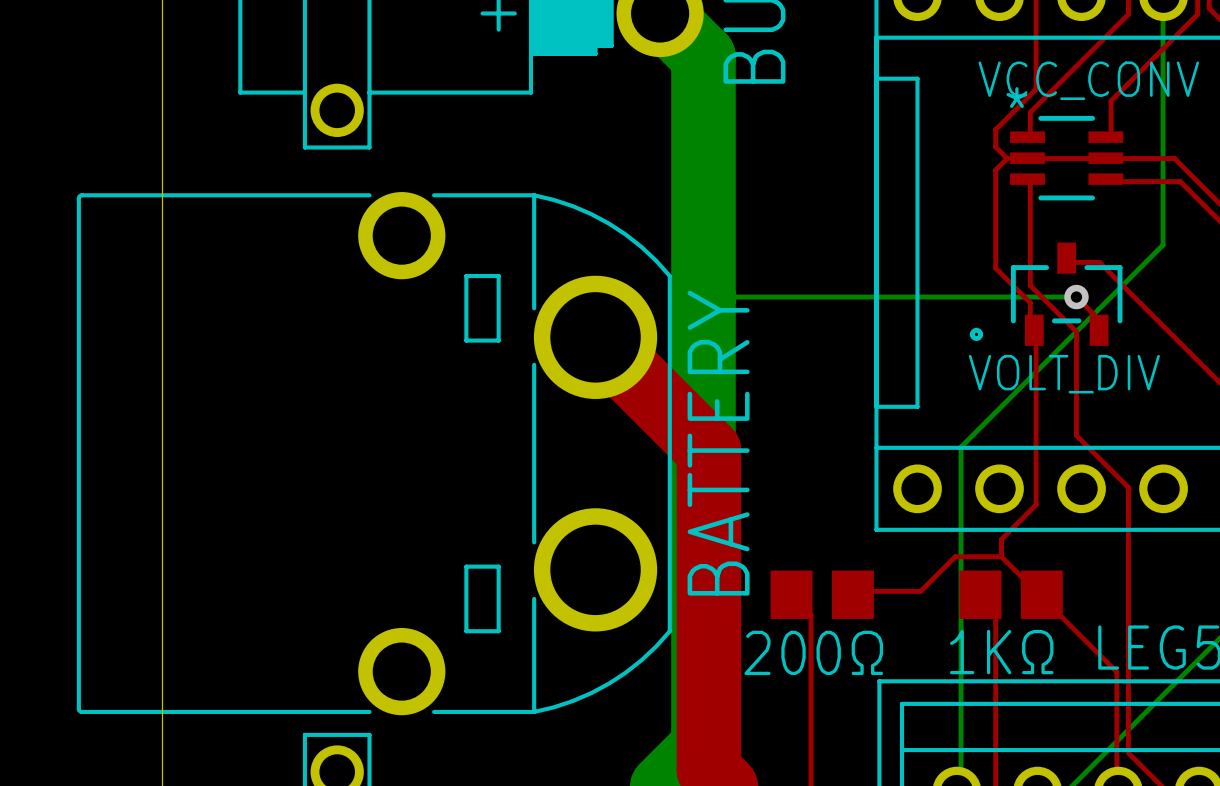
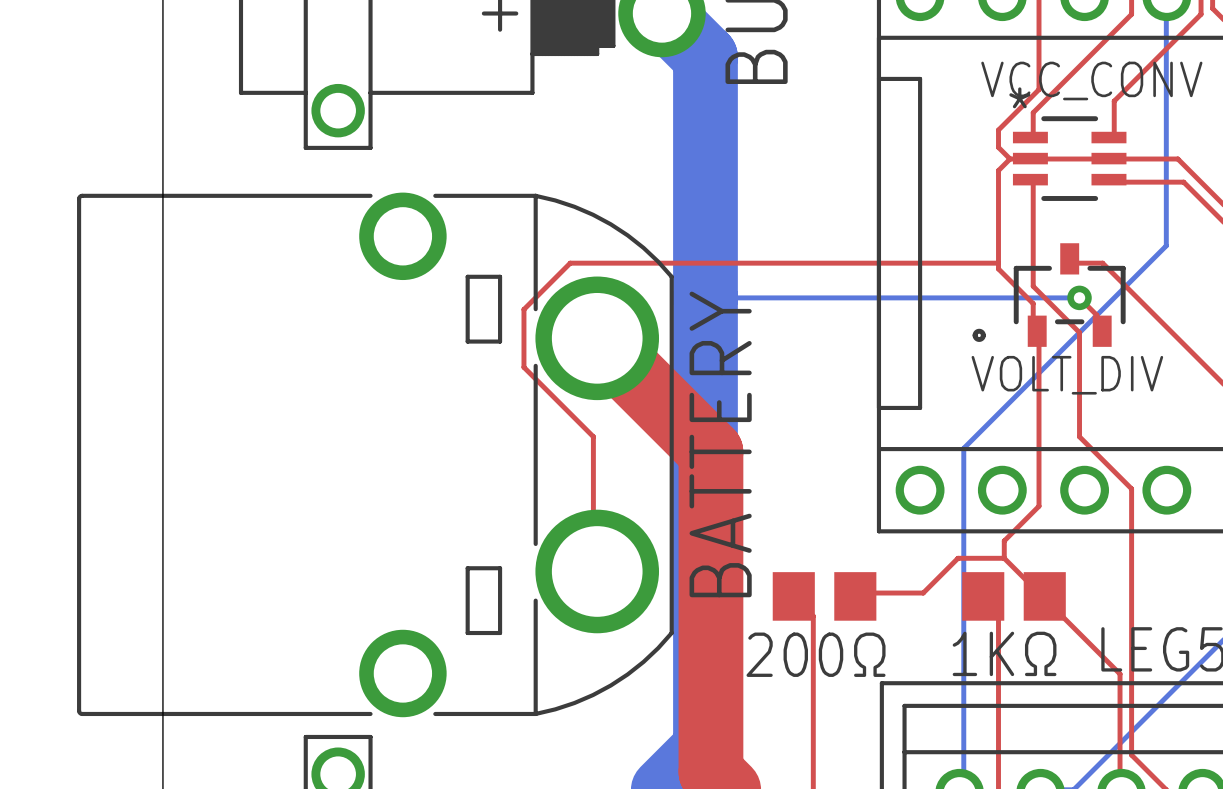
top track: none -> (998, 263) (570, 263) (523, 309) (523, 367) (593, 436) (593, 569) (597, 571)

